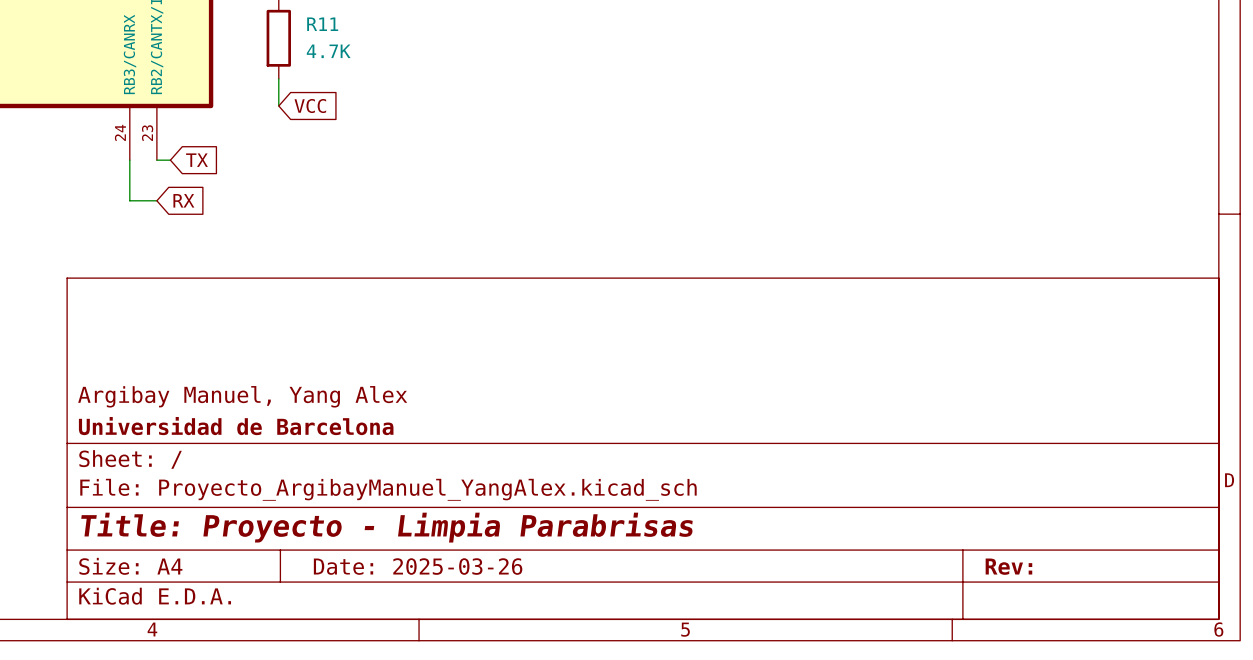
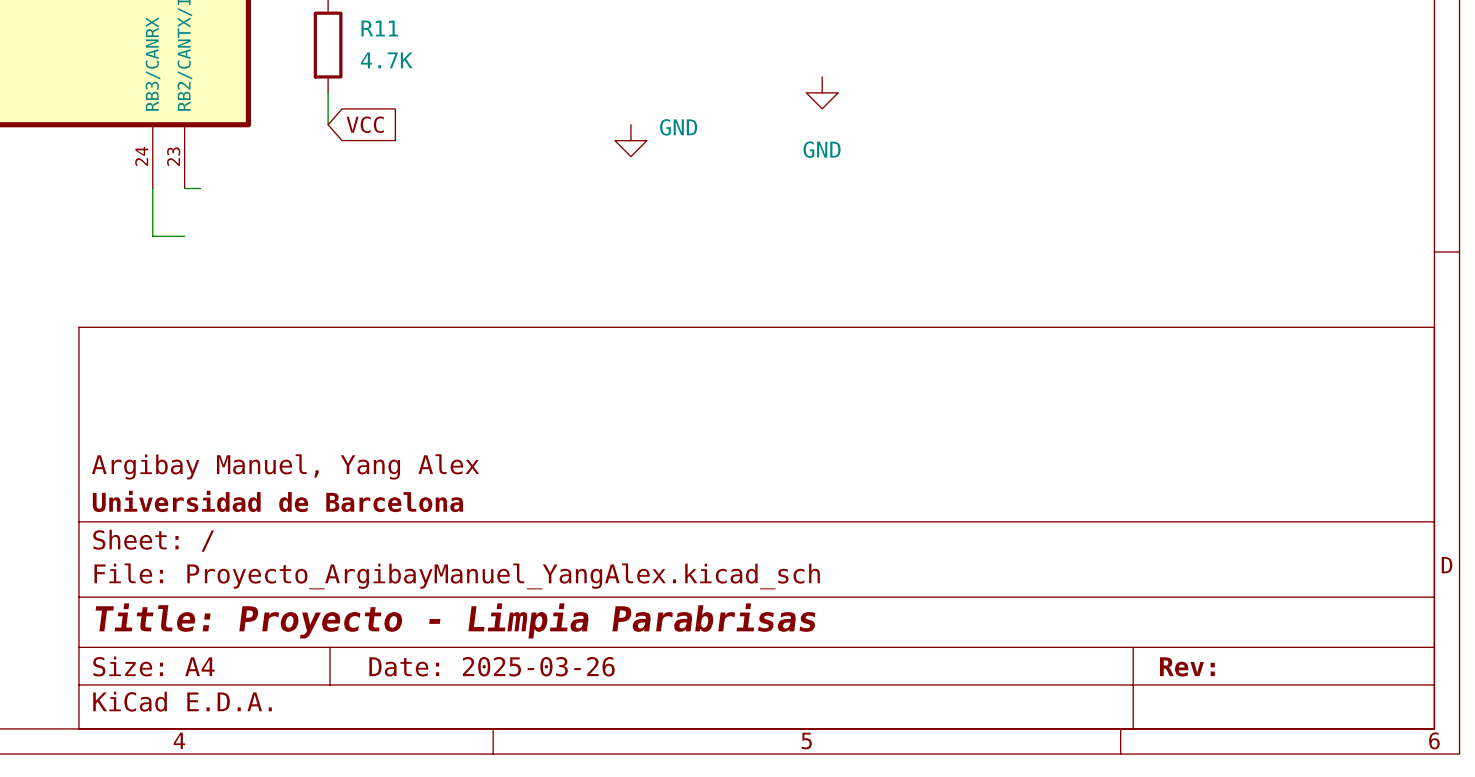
power symbol: none -> GND (822, 92)
power symbol: none -> GND (630, 140)
global label: TX (196, 160) -> none
global label: RX (183, 200) -> none

